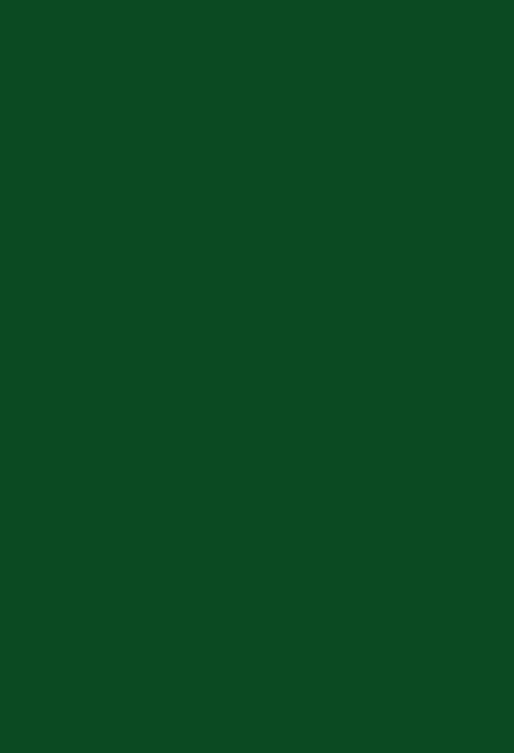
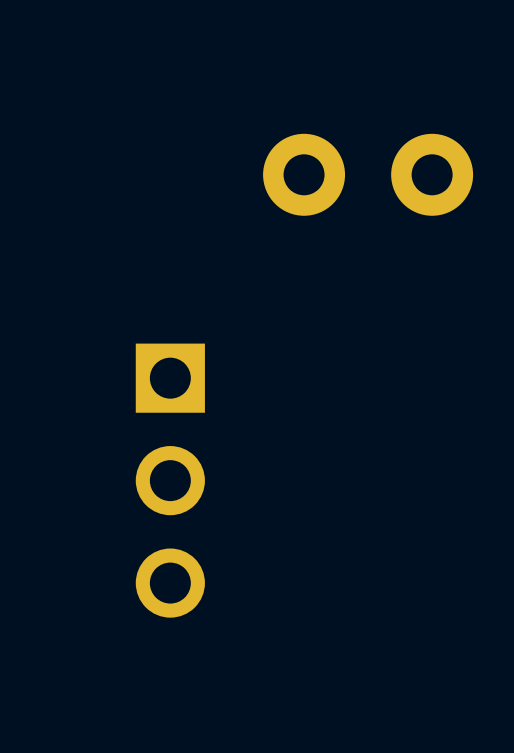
part: none -> (368, 174)
part: none -> (170, 480)

